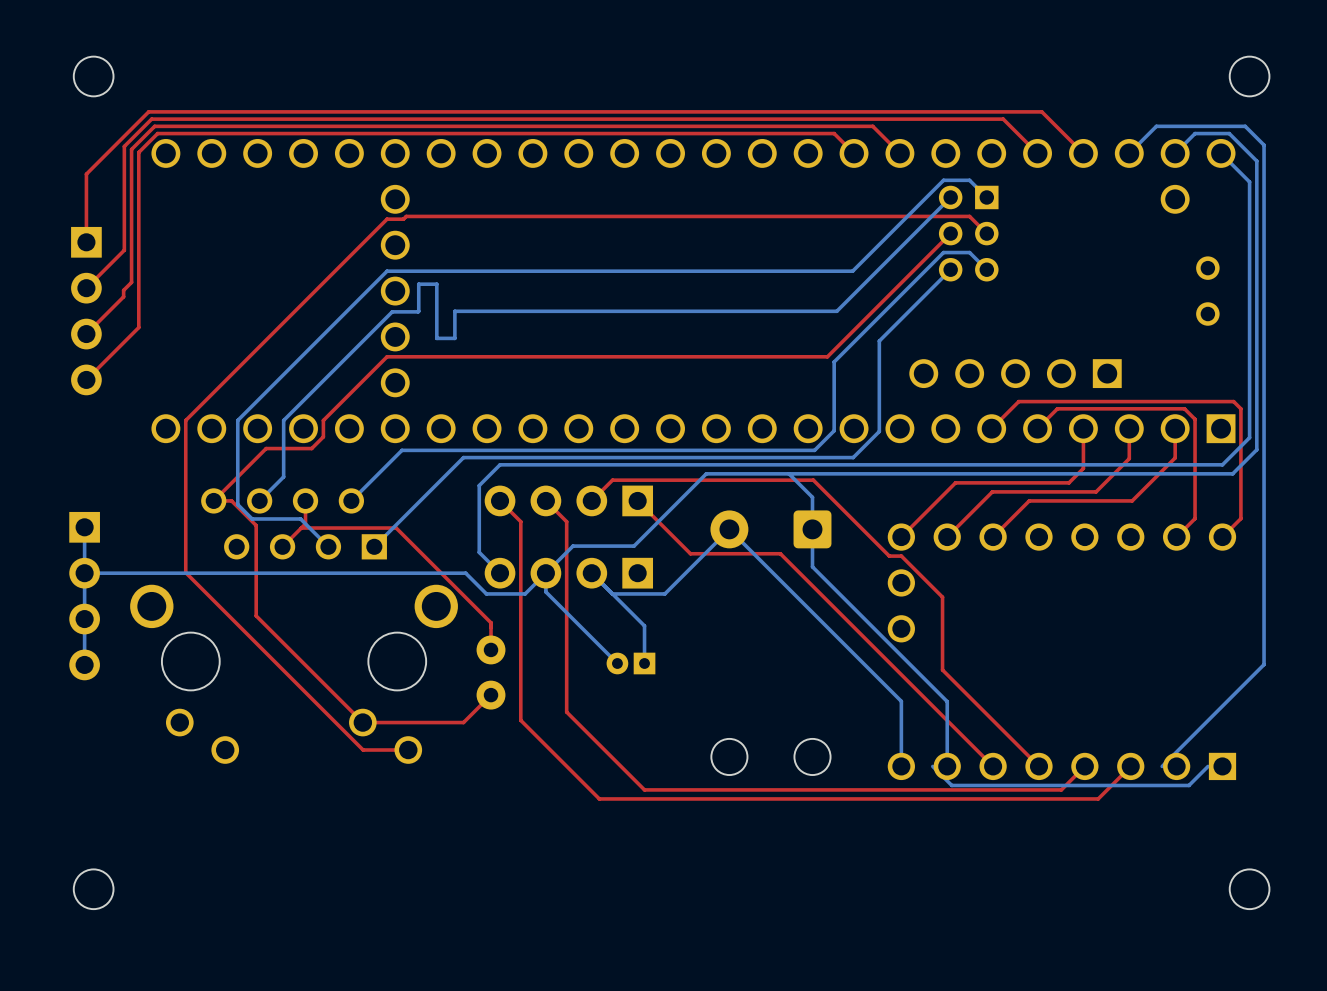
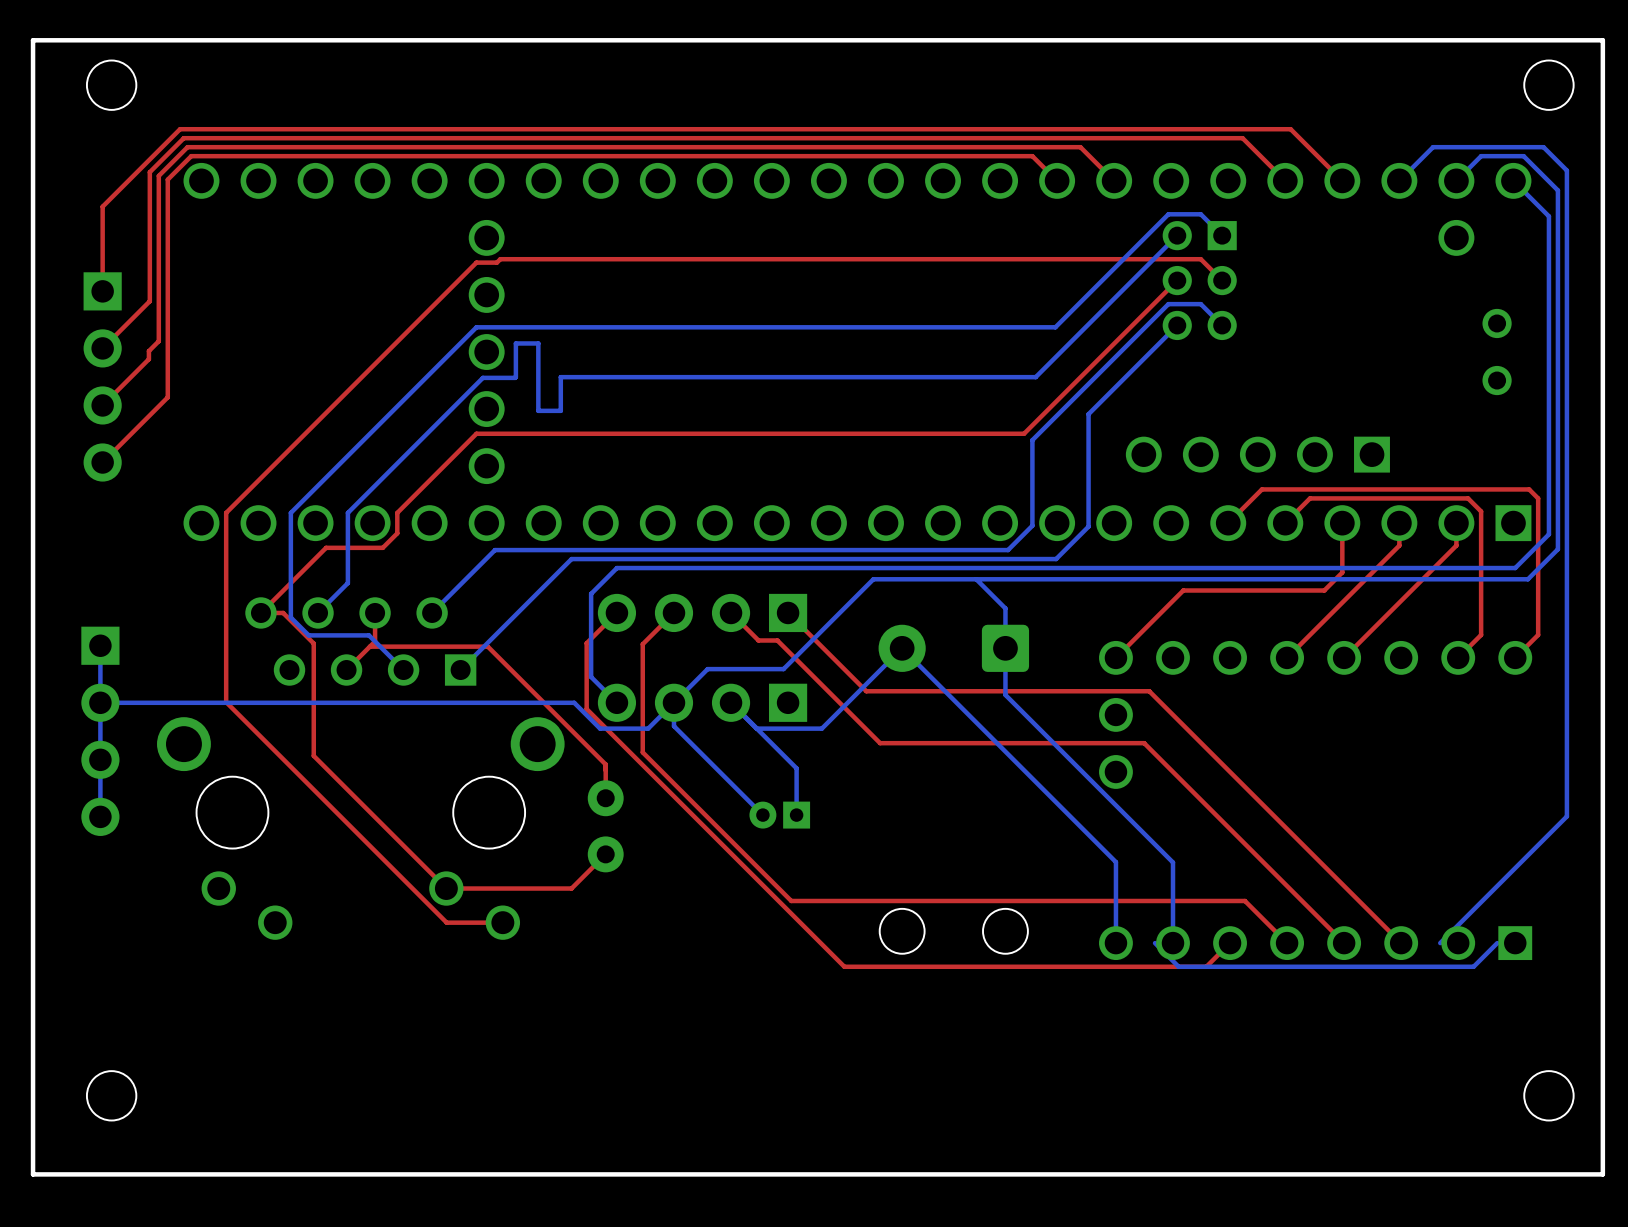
board edge: none -> (1602, 40) (33, 40) (33, 1174) (1602, 1174) (1602, 40)
top track: (1129, 446) (1129, 458) (1096, 491) (992, 491) (947, 537) -> (1399, 545) (1287, 657)
top track: (1175, 446) (1175, 457) (1132, 500) (1029, 500) (993, 537) -> (1456, 545) (1344, 657)
top track: (500, 500) (520, 521) (520, 526) -> (673, 612) (642, 644)
top track: none -> (616, 612) (586, 643) (586, 709) (844, 966) (1206, 966) (1230, 943)
top track: (545, 500) (566, 521) (566, 712) (644, 789) (1061, 789) (1084, 766) -> (731, 612) (758, 640) (777, 640) (880, 743) (1144, 743) (1344, 943)
top track: (591, 500) (612, 480) (813, 480) (889, 556) (901, 556) (942, 597) (942, 669) (1005, 732) -> none
top track: (690, 553) (780, 553) (993, 766) -> (853, 678) (866, 691) (1149, 691) (1401, 943)
top track: (520, 613) (520, 720) (599, 798) (1098, 798) (1130, 766) -> (642, 752) (791, 900) (1244, 900)

